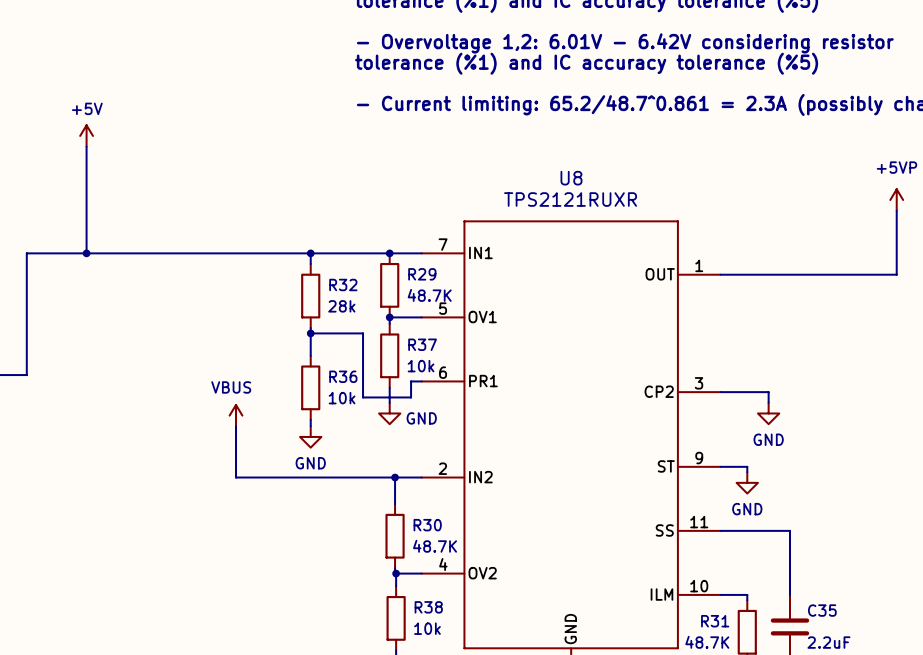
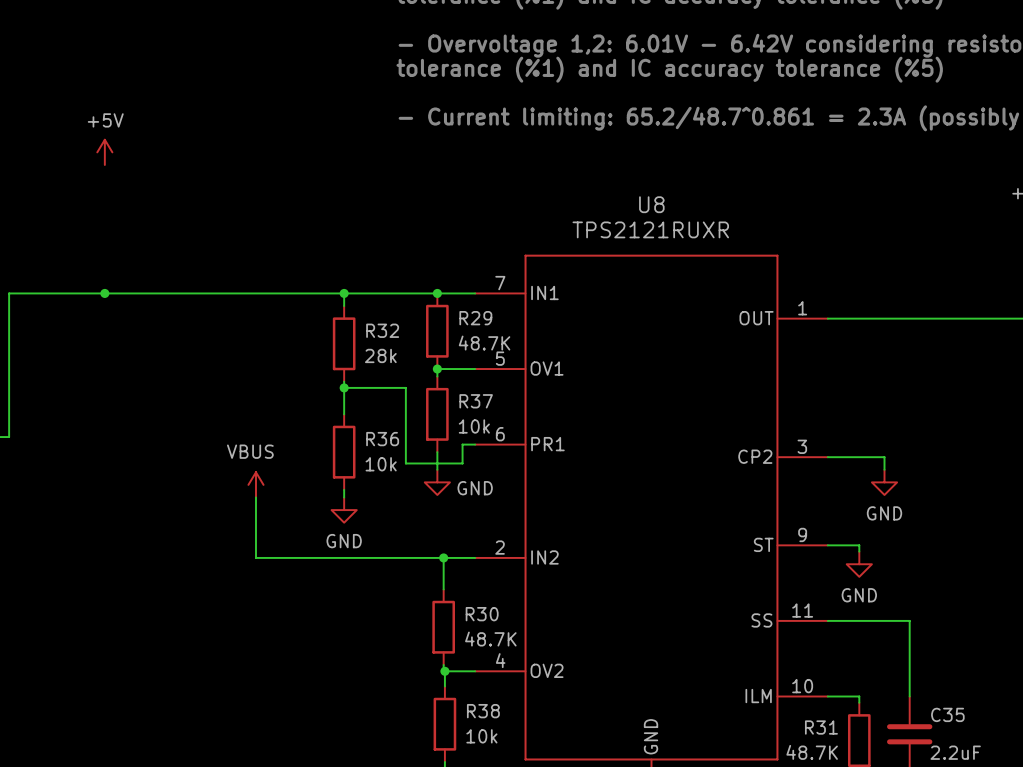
power symbol position: +5V (86, 135) -> +5V (104, 152)
wire: (86, 146) (86, 253) -> none
junction position: (86, 253) -> (104, 293)

